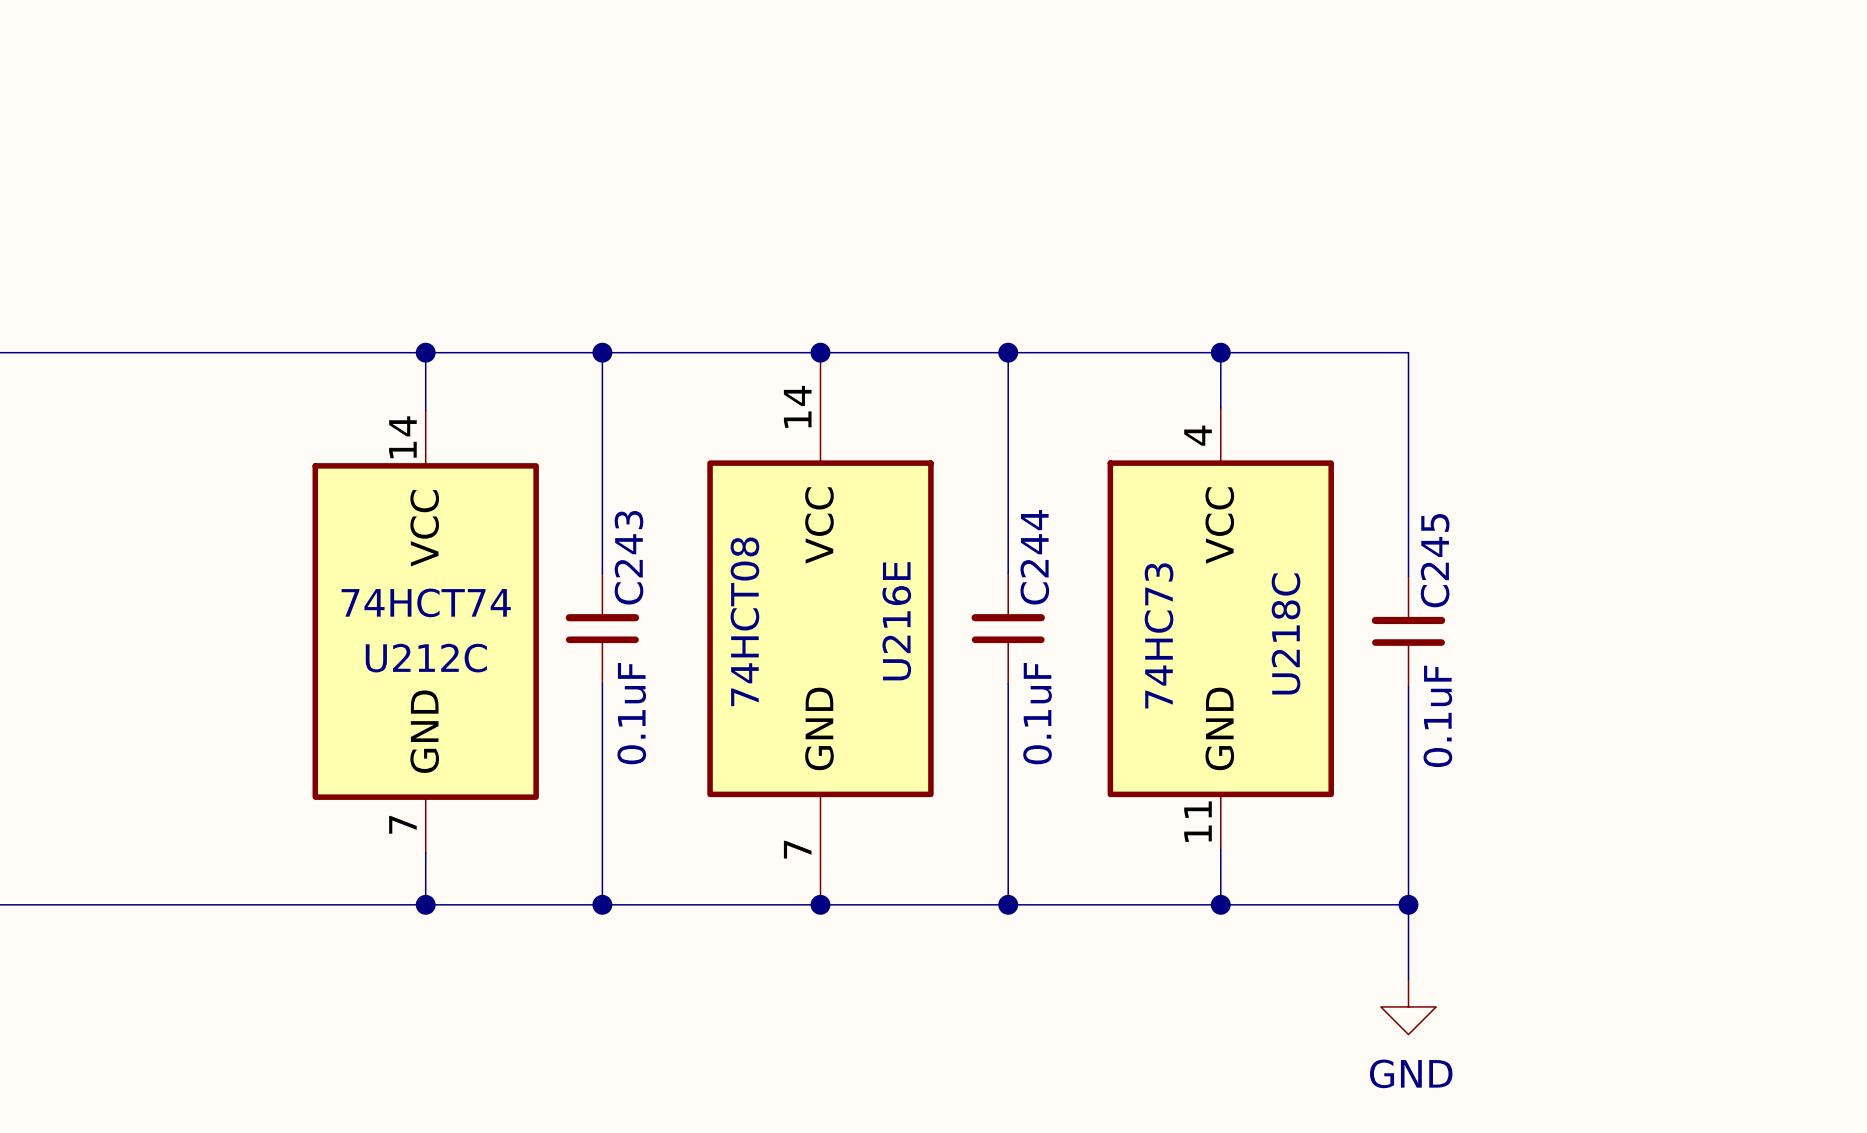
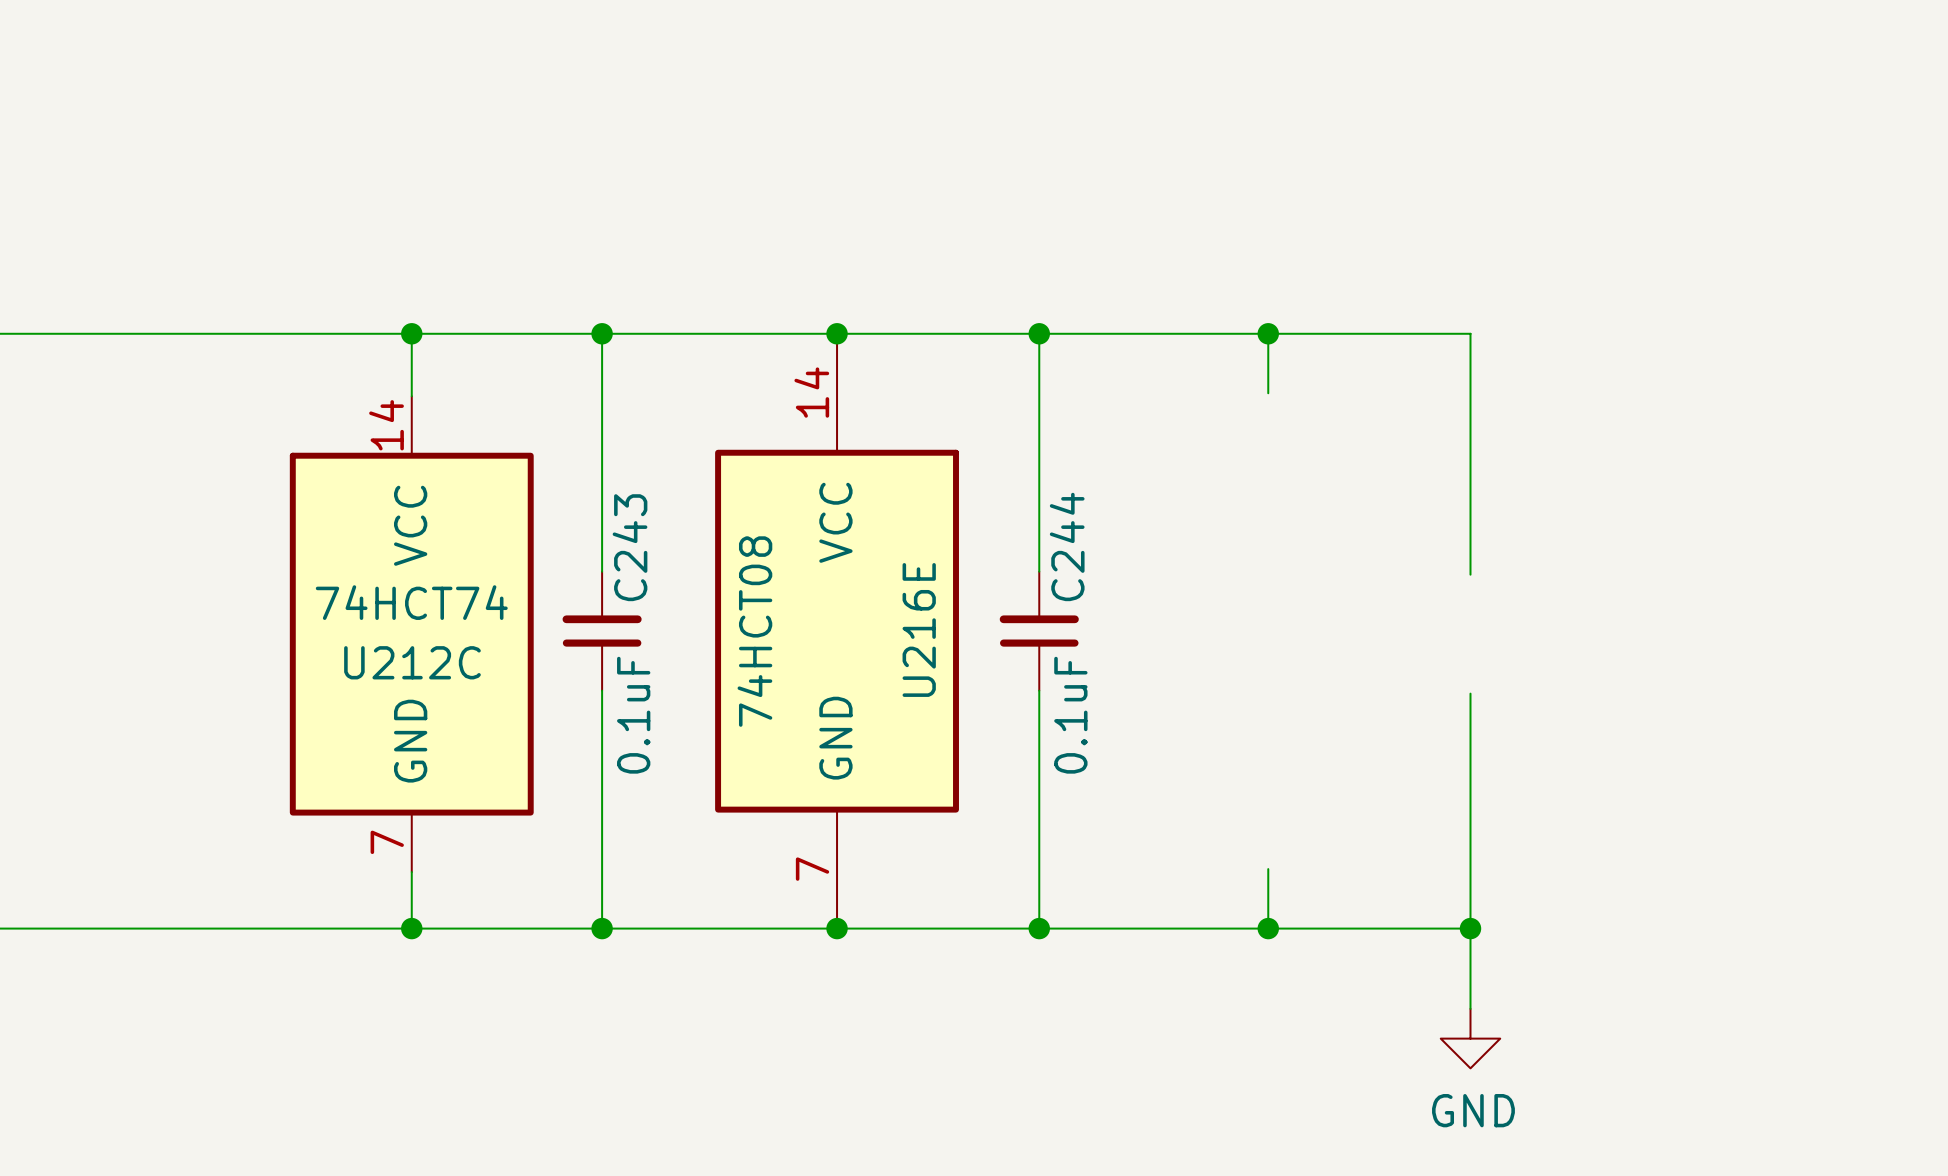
U218C: 74HC73 (1220, 628) -> none
C245: 0.1uF (1408, 631) -> none

